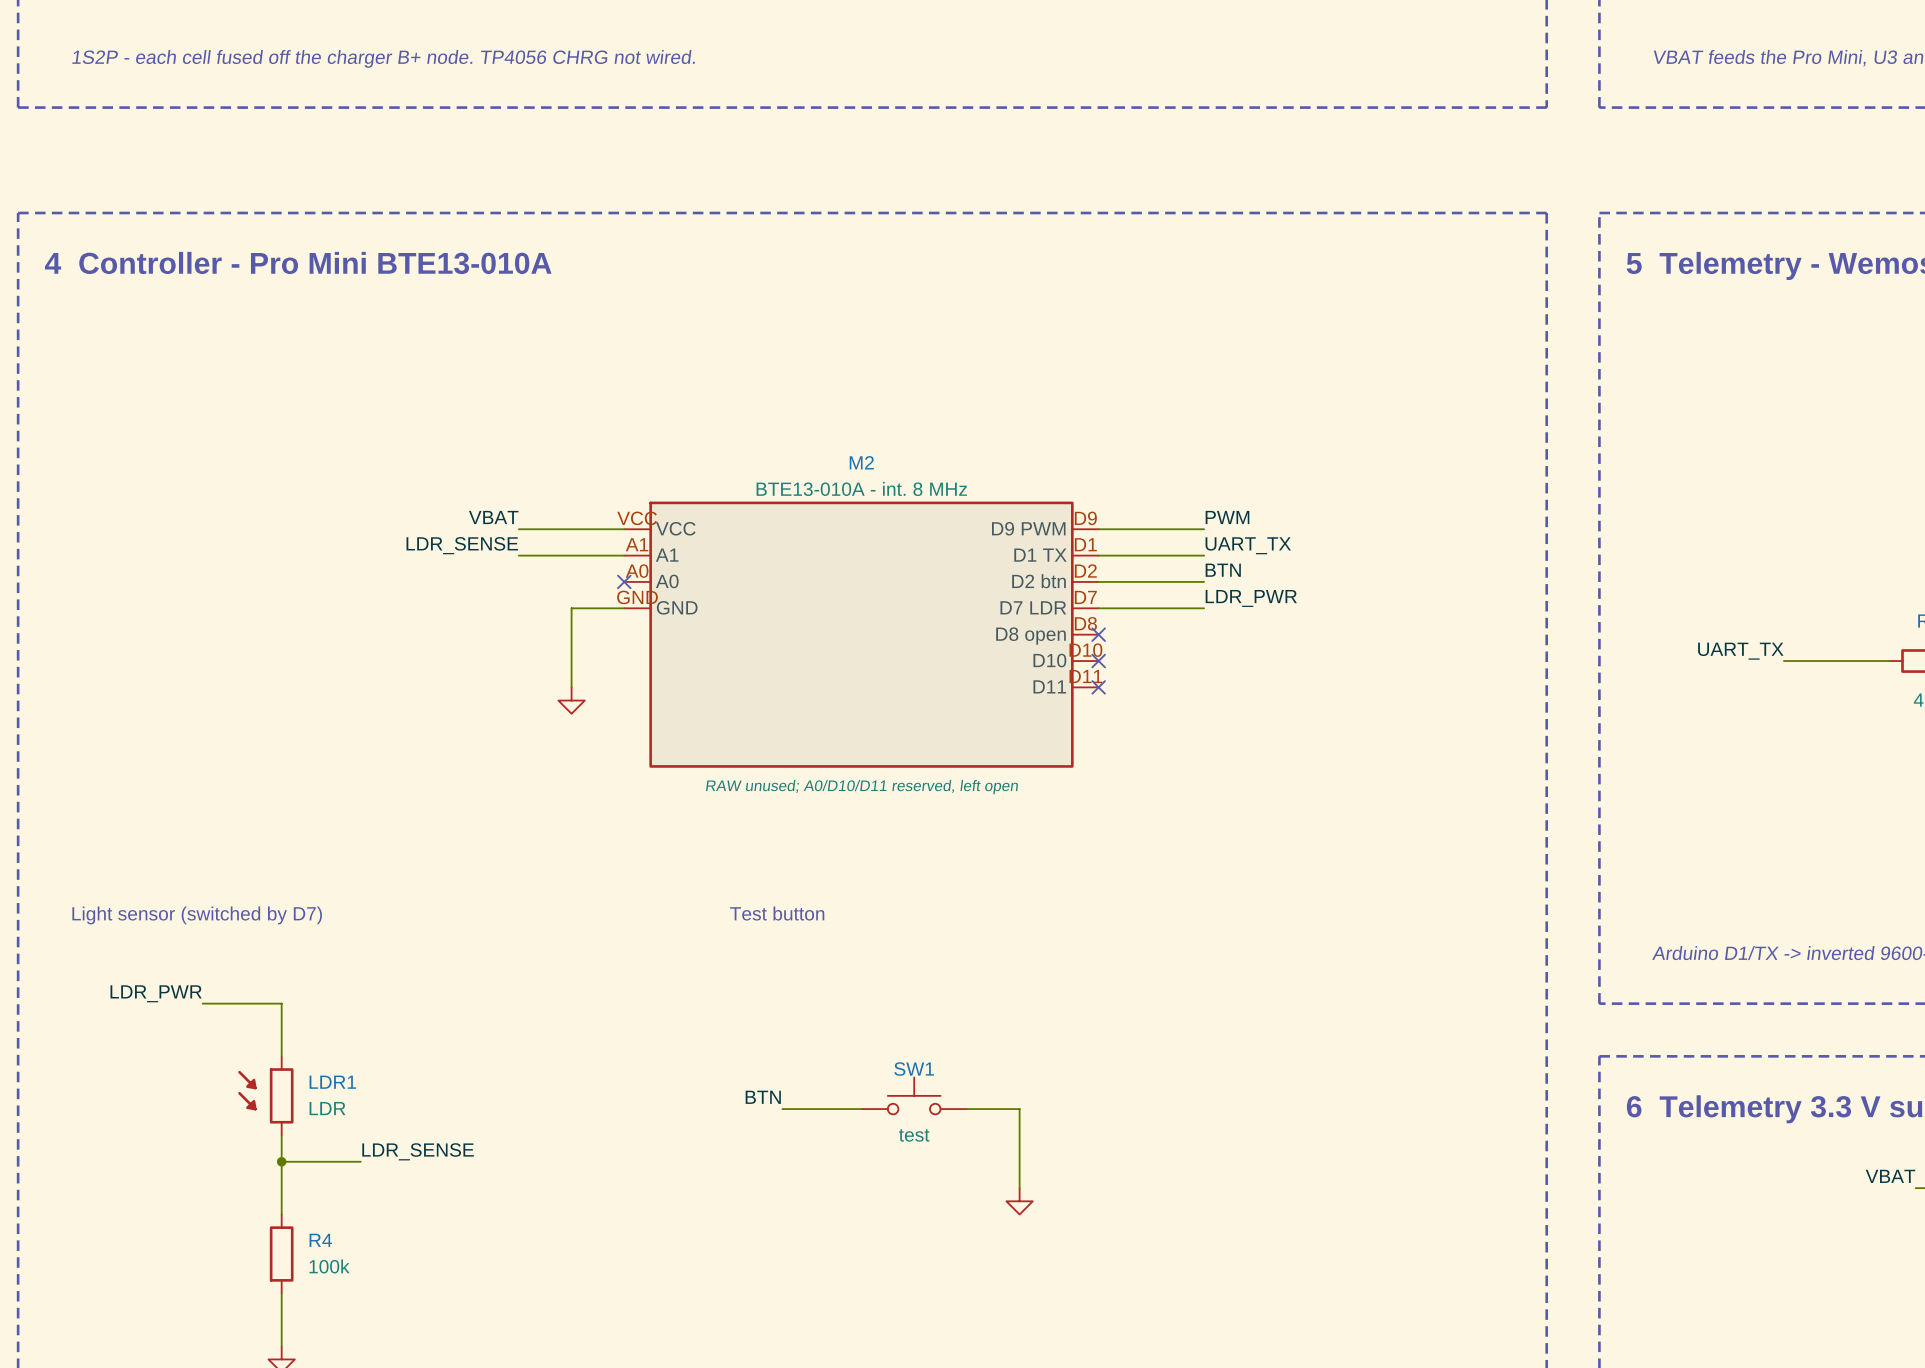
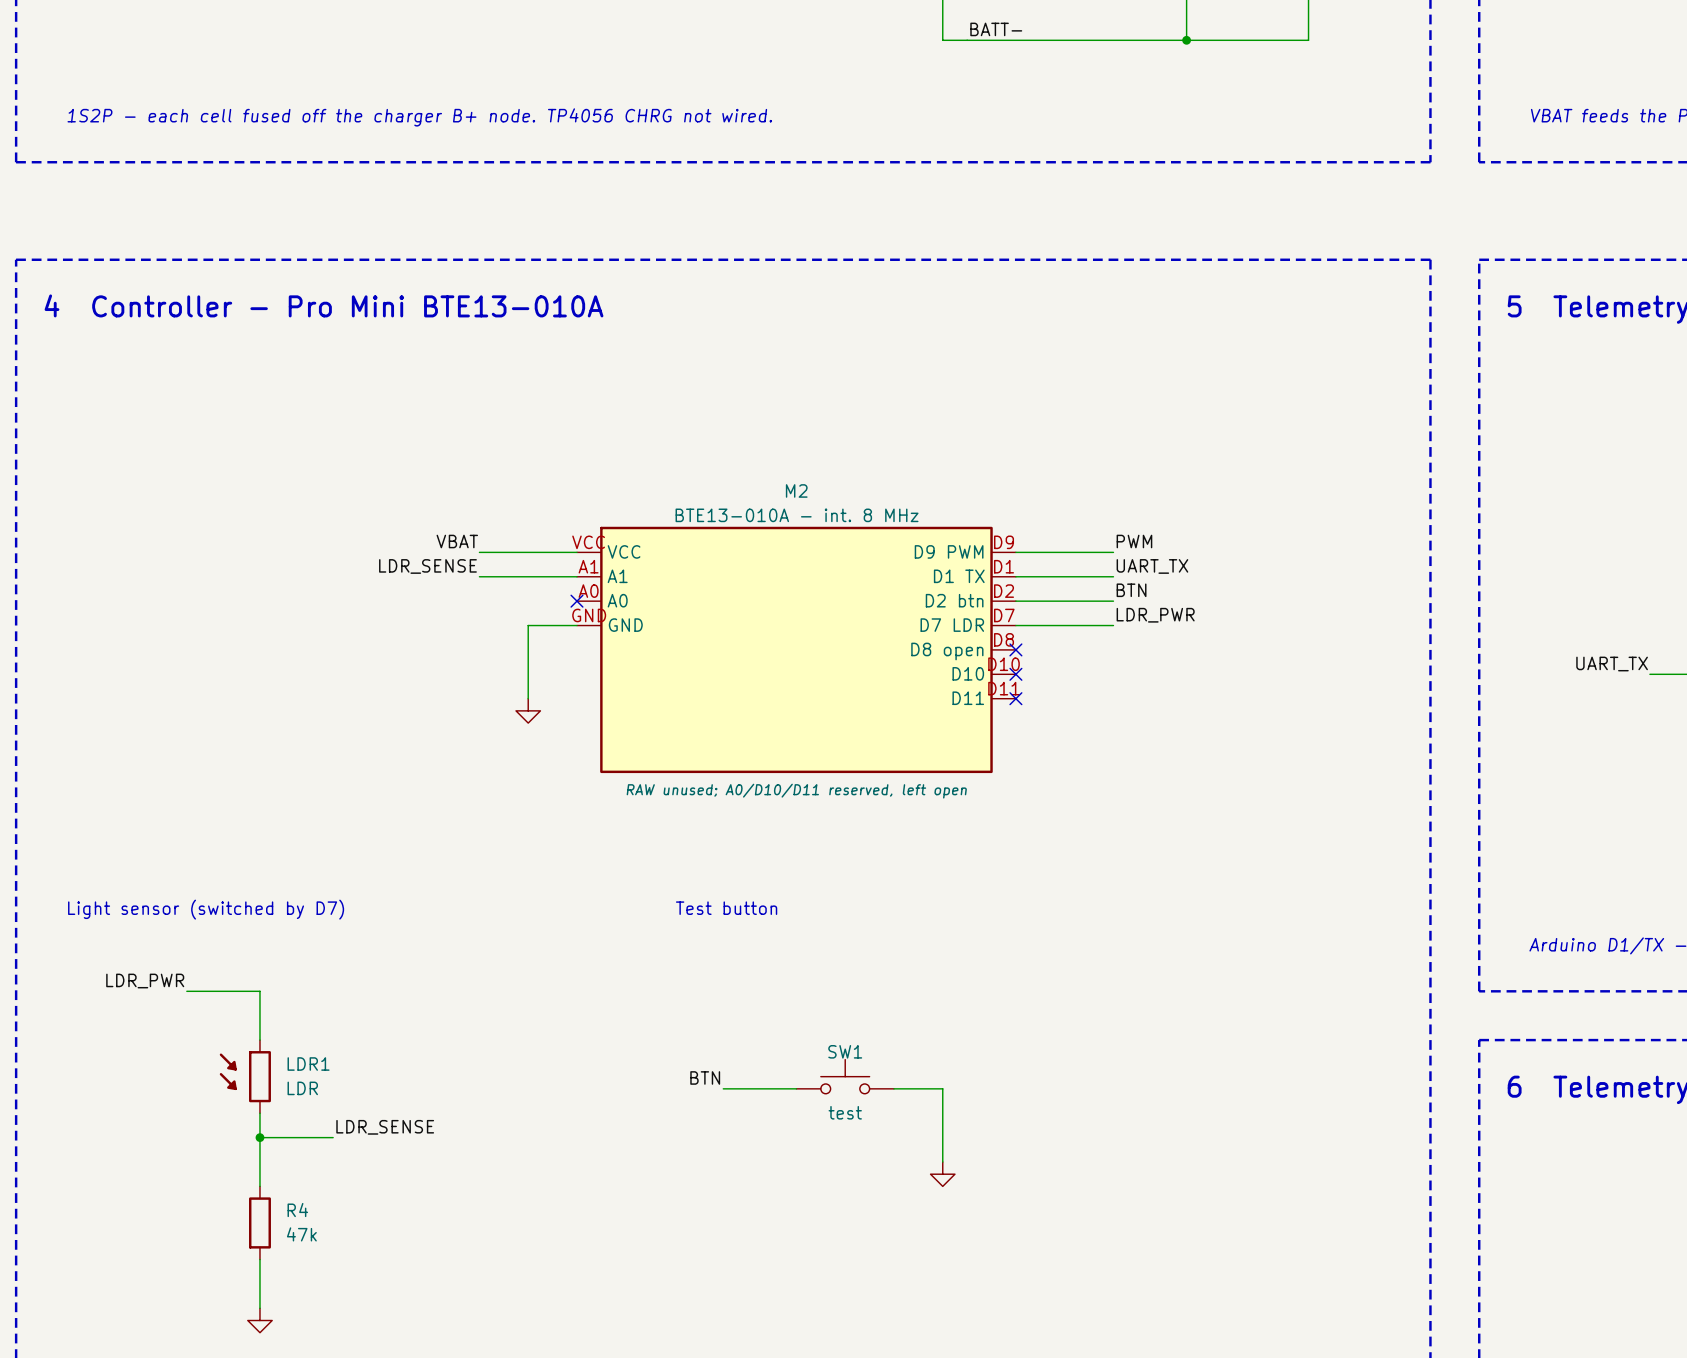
R4 value: 100k (329, 1266) -> 47k (301, 1234)

